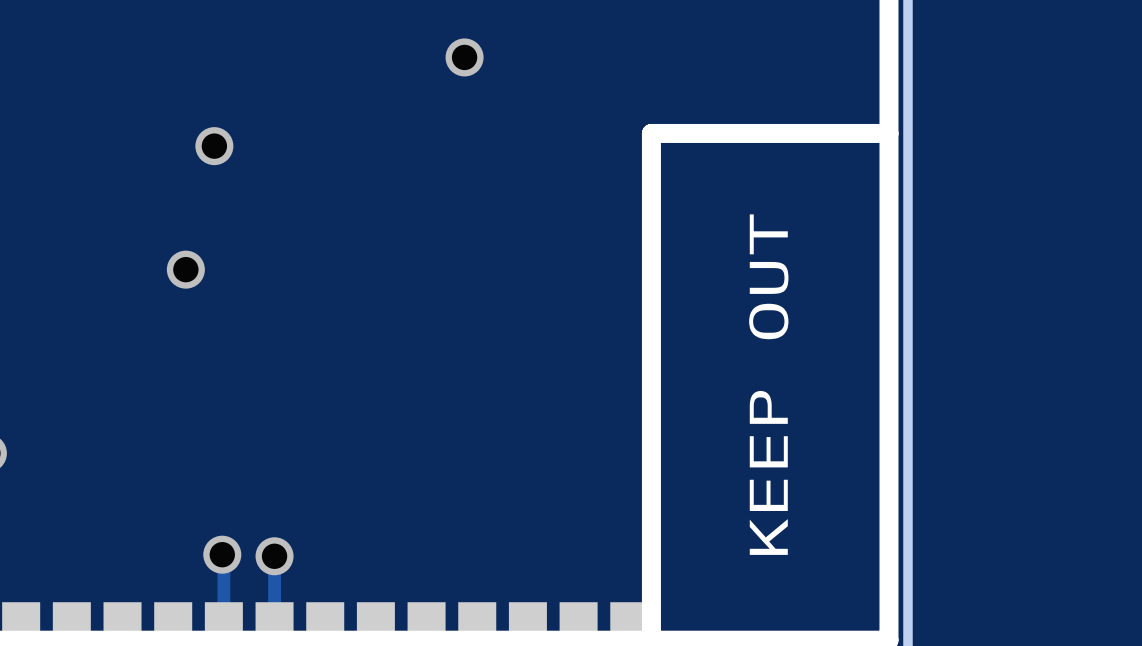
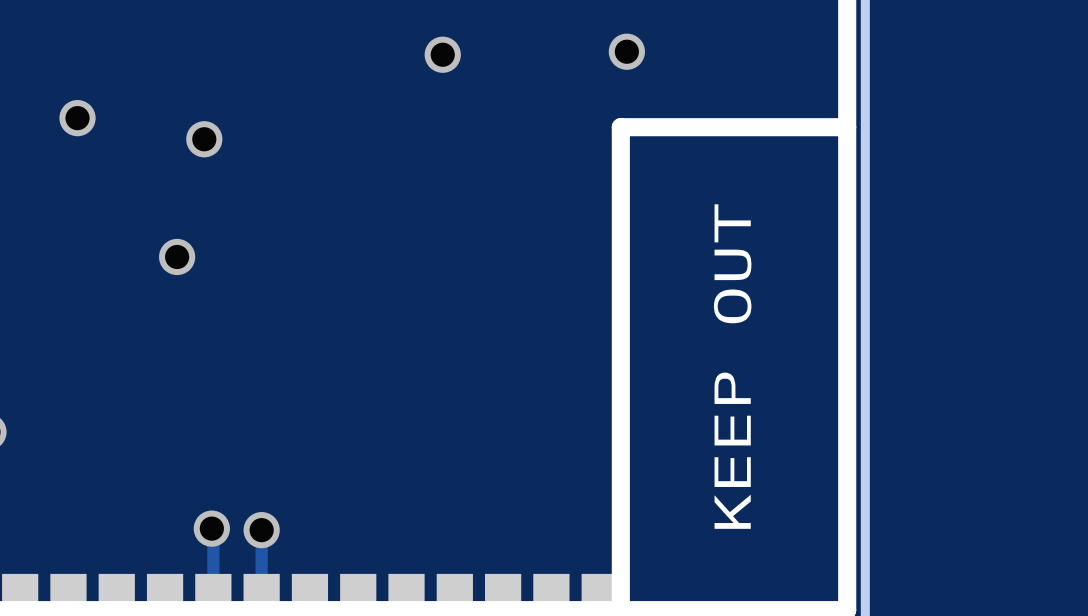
via: none -> (626, 51)
via: none -> (77, 118)

